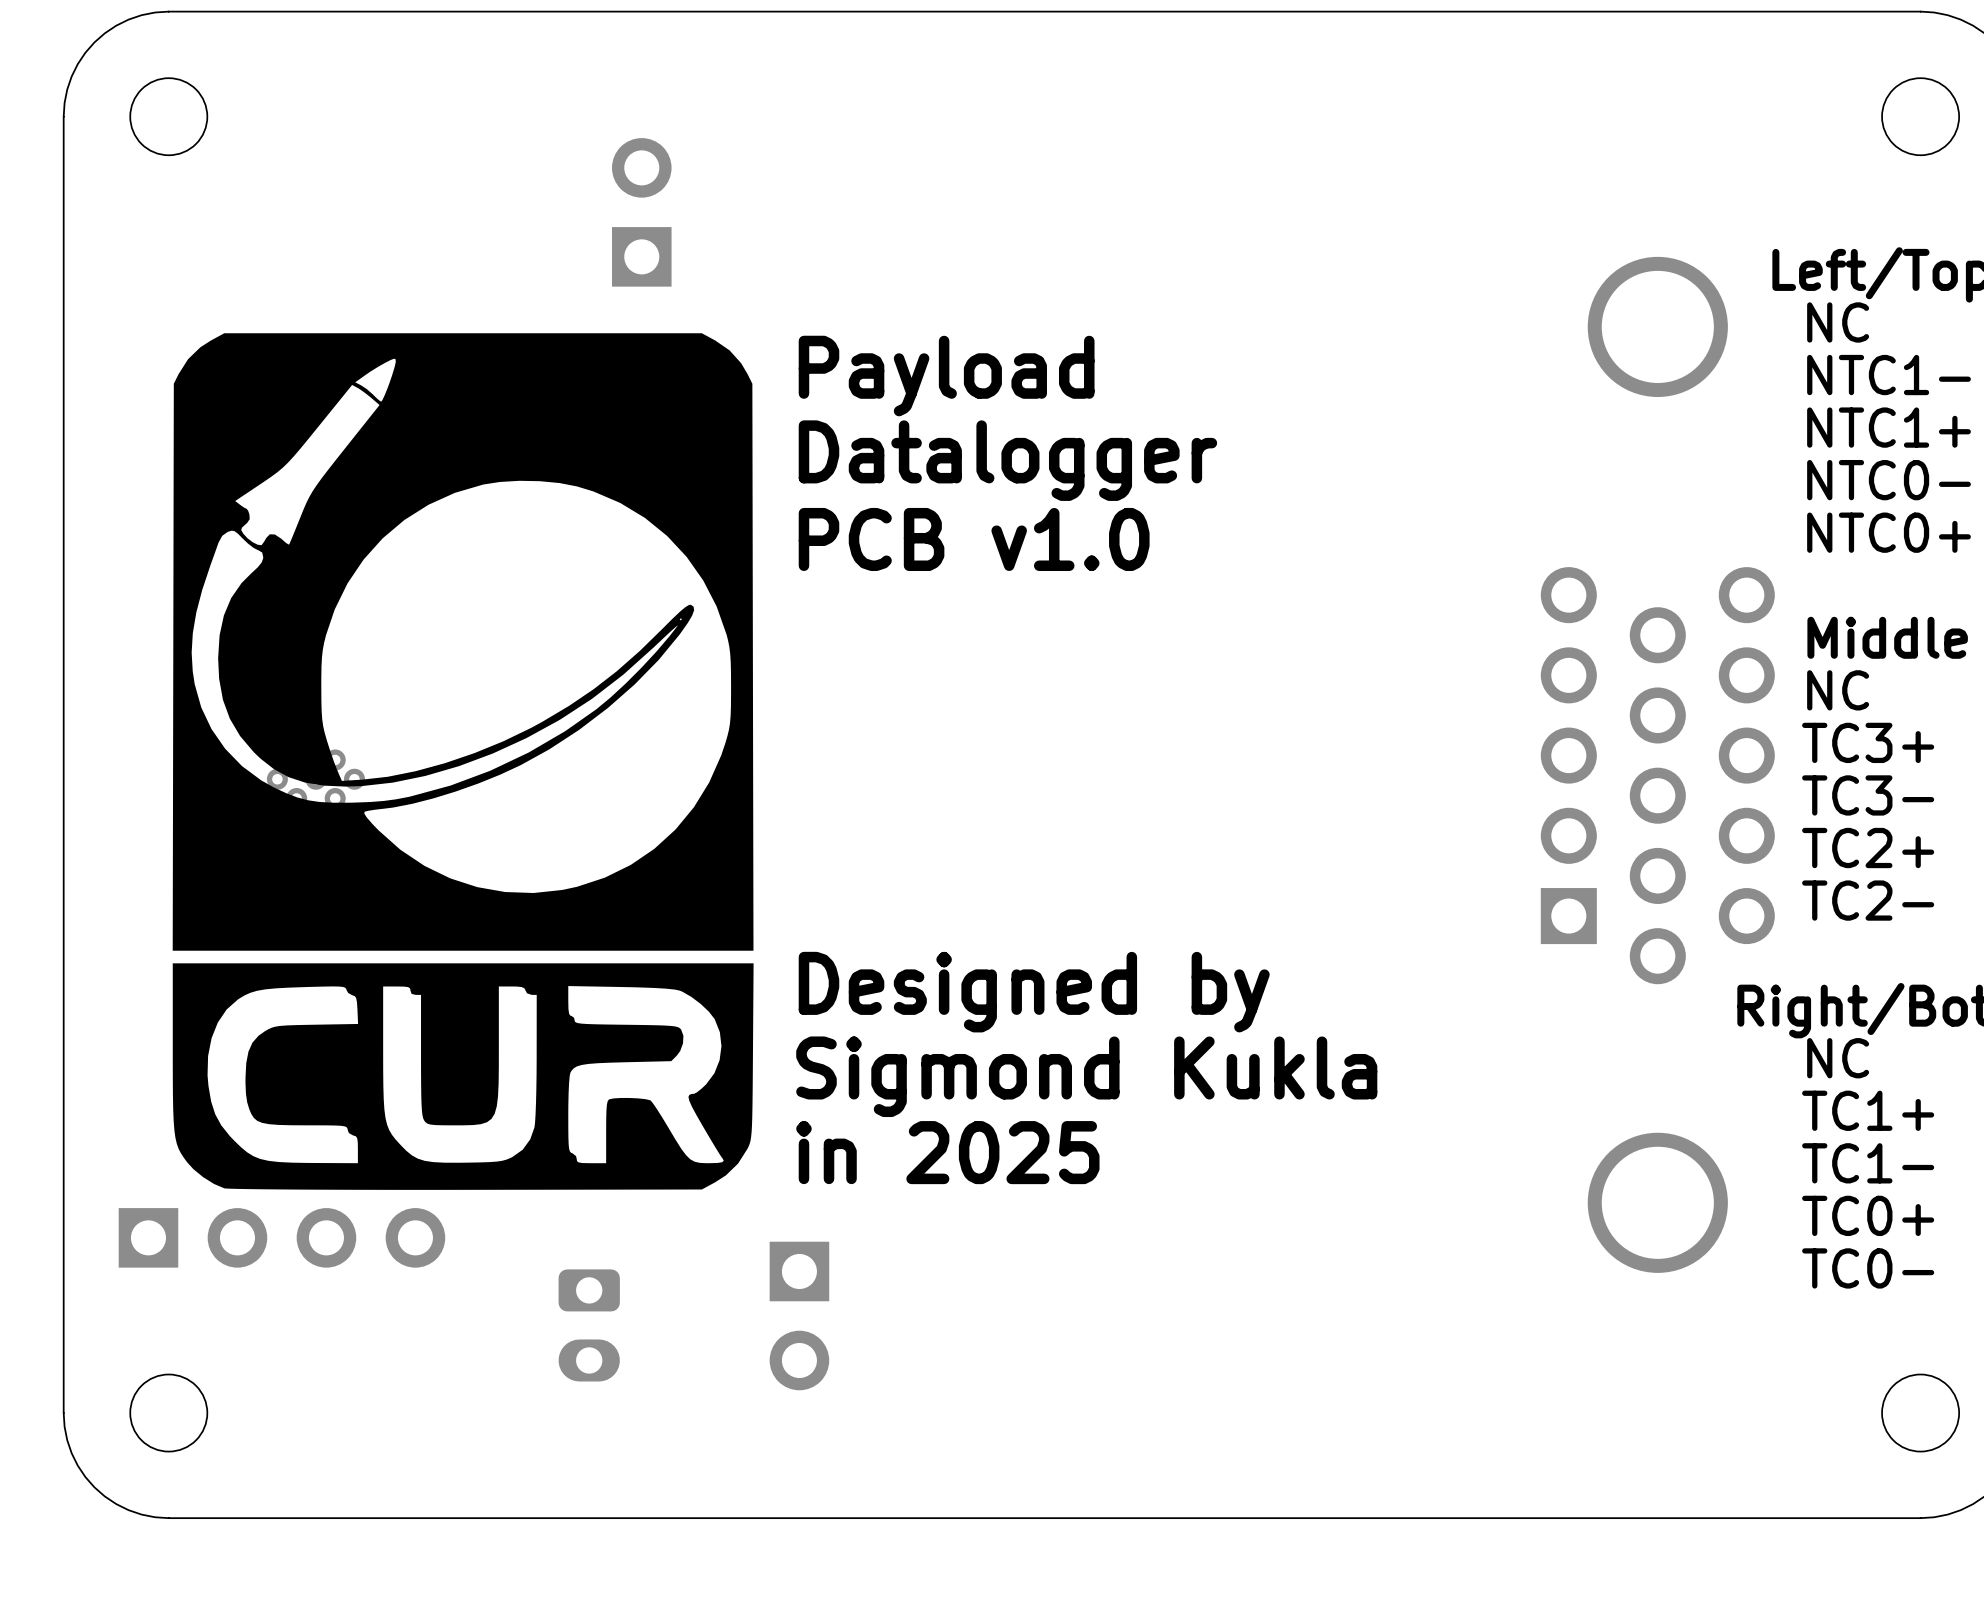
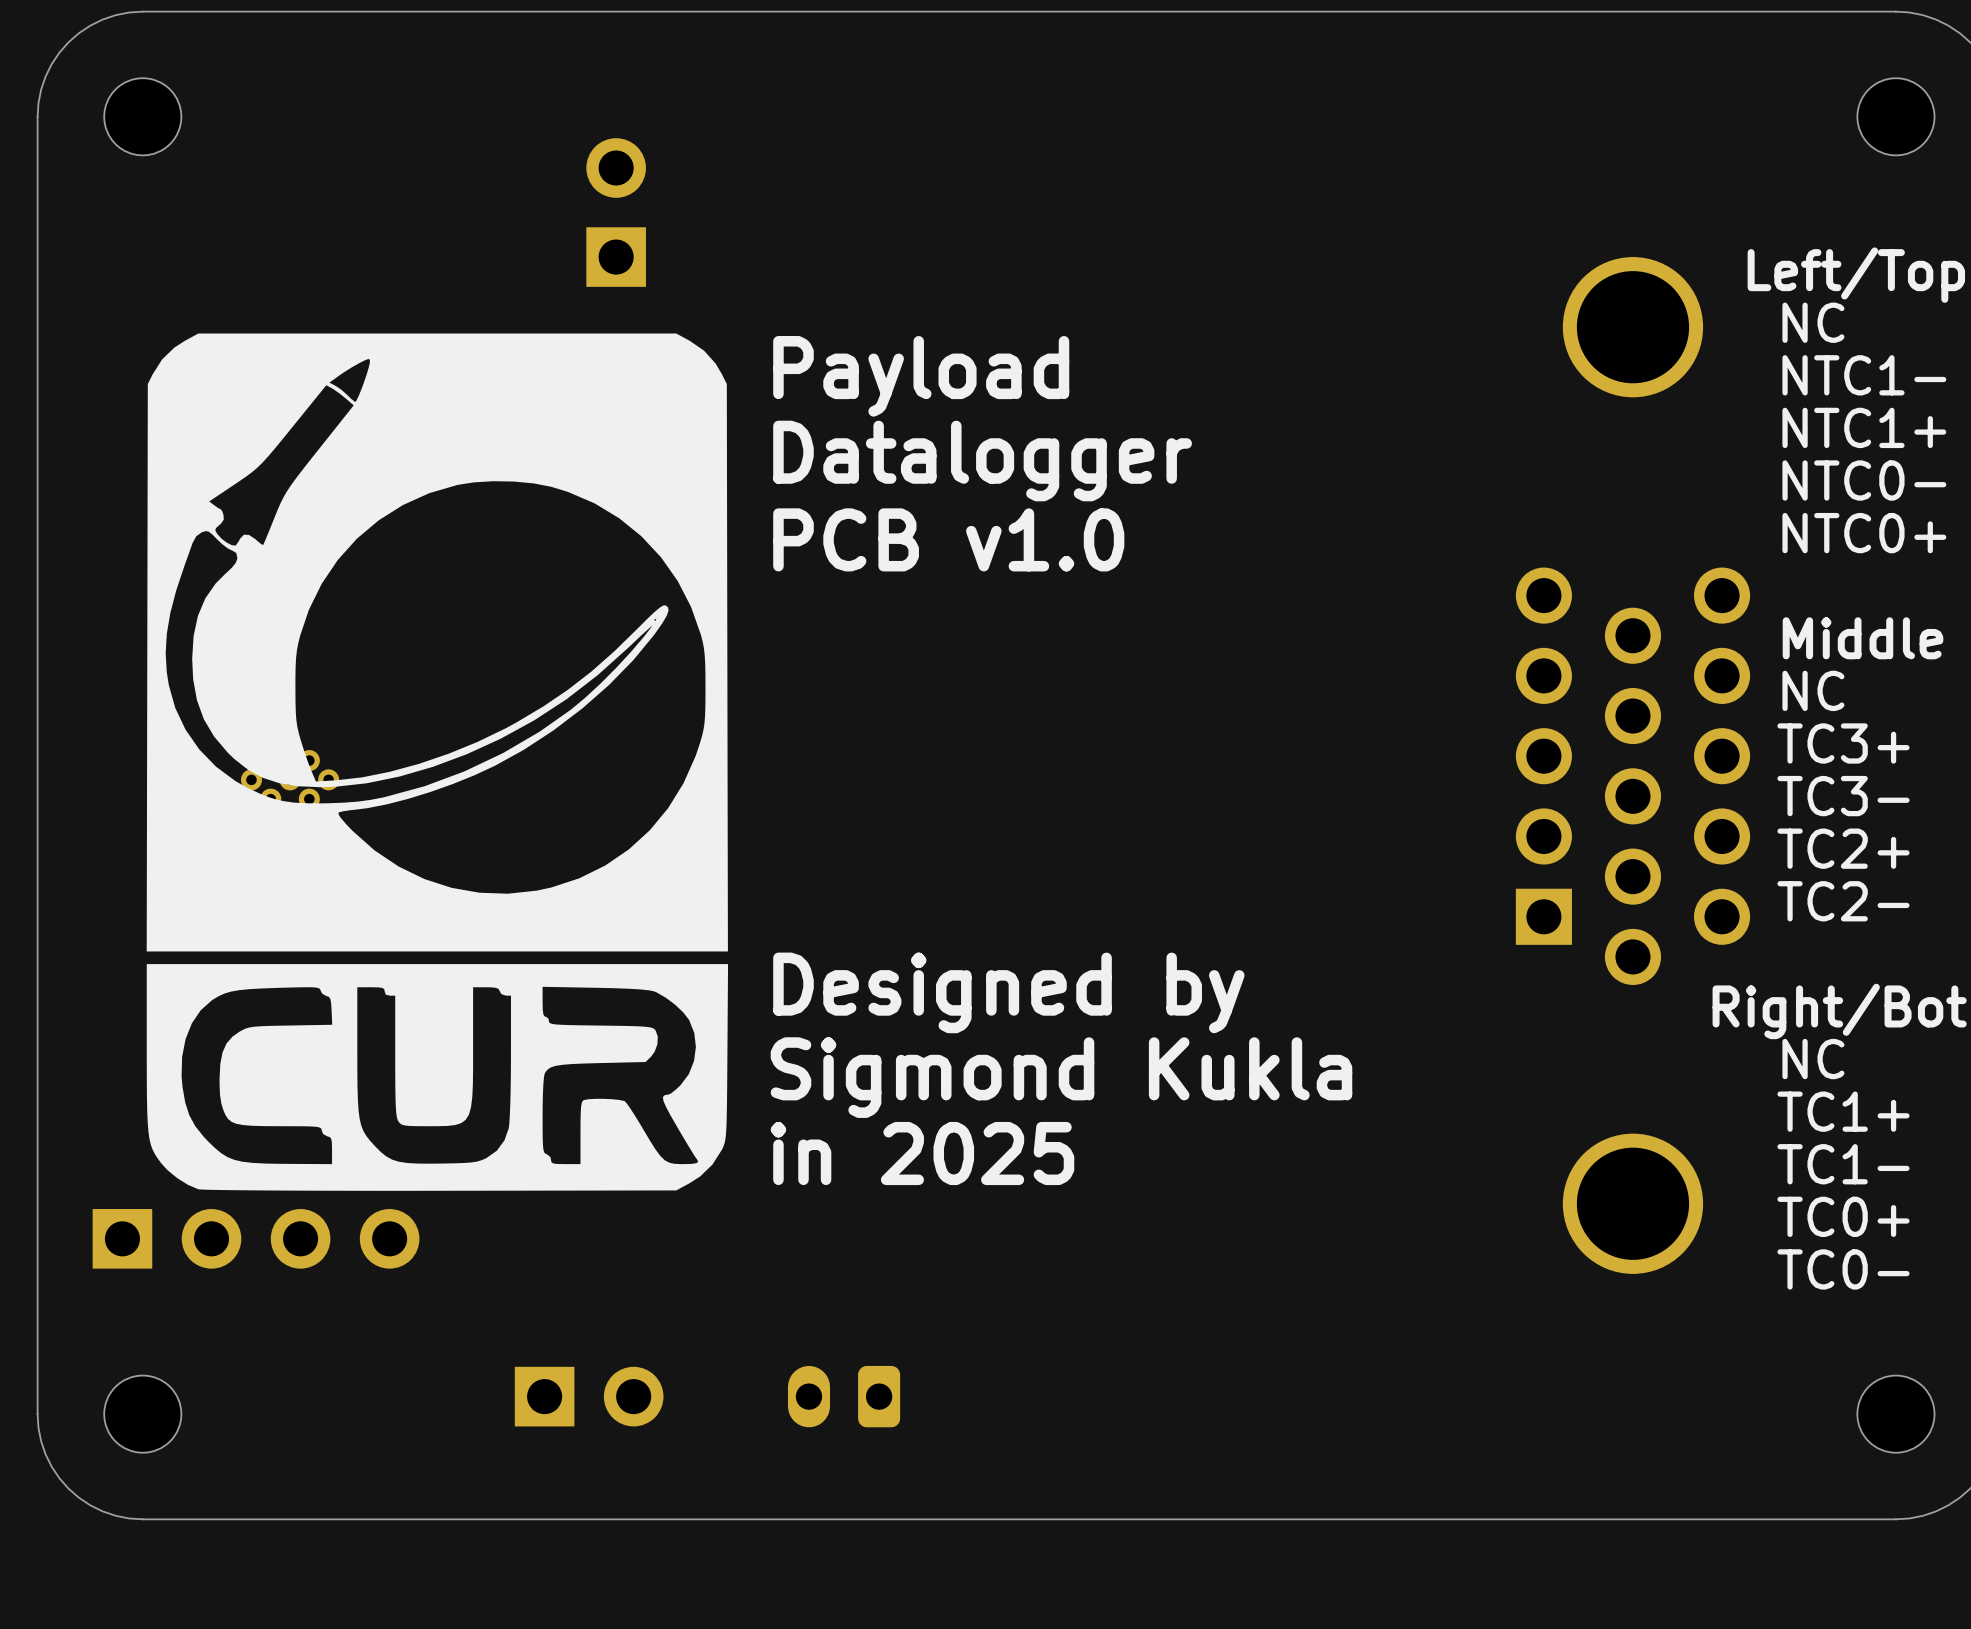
part rotation: 0° (799, 1315) -> 90° counterclockwise (589, 1396)
part position: (799, 1315) -> (589, 1396)
part rotation: 0° (589, 1325) -> 90° clockwise (844, 1396)
part position: (589, 1325) -> (844, 1396)

